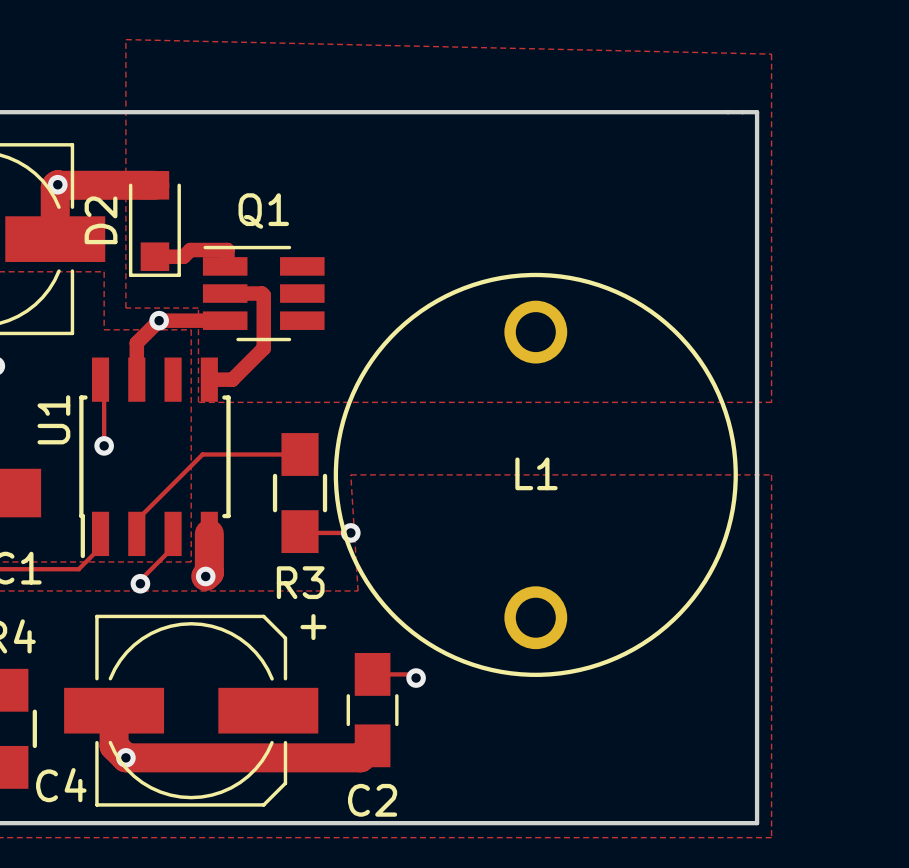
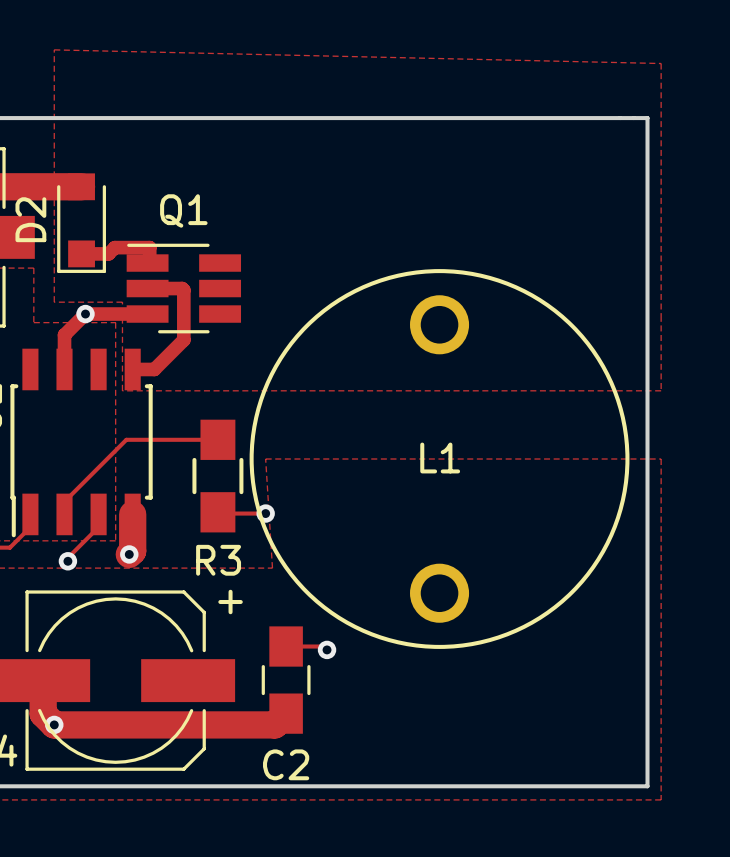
track: (100, 379) (104, 383) (104, 445) -> none
via: (104, 445) -> none

